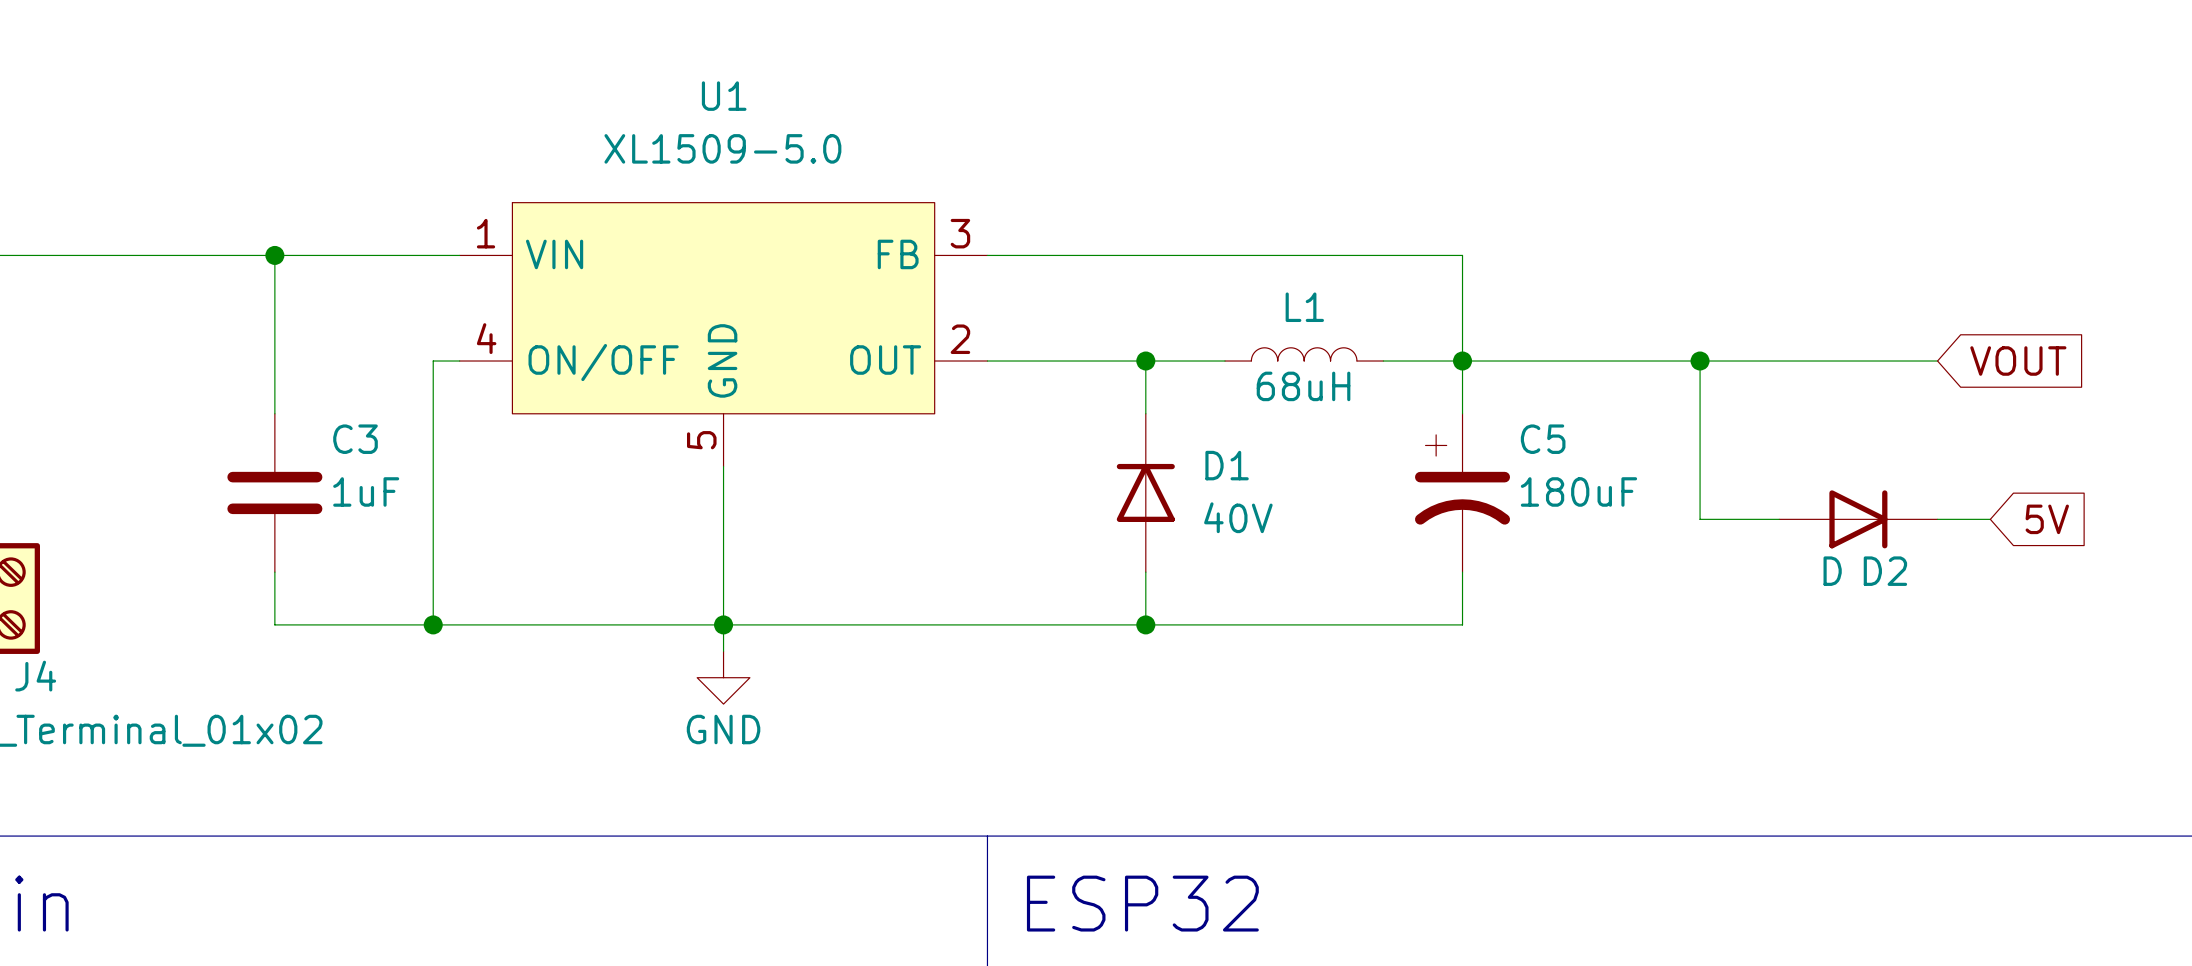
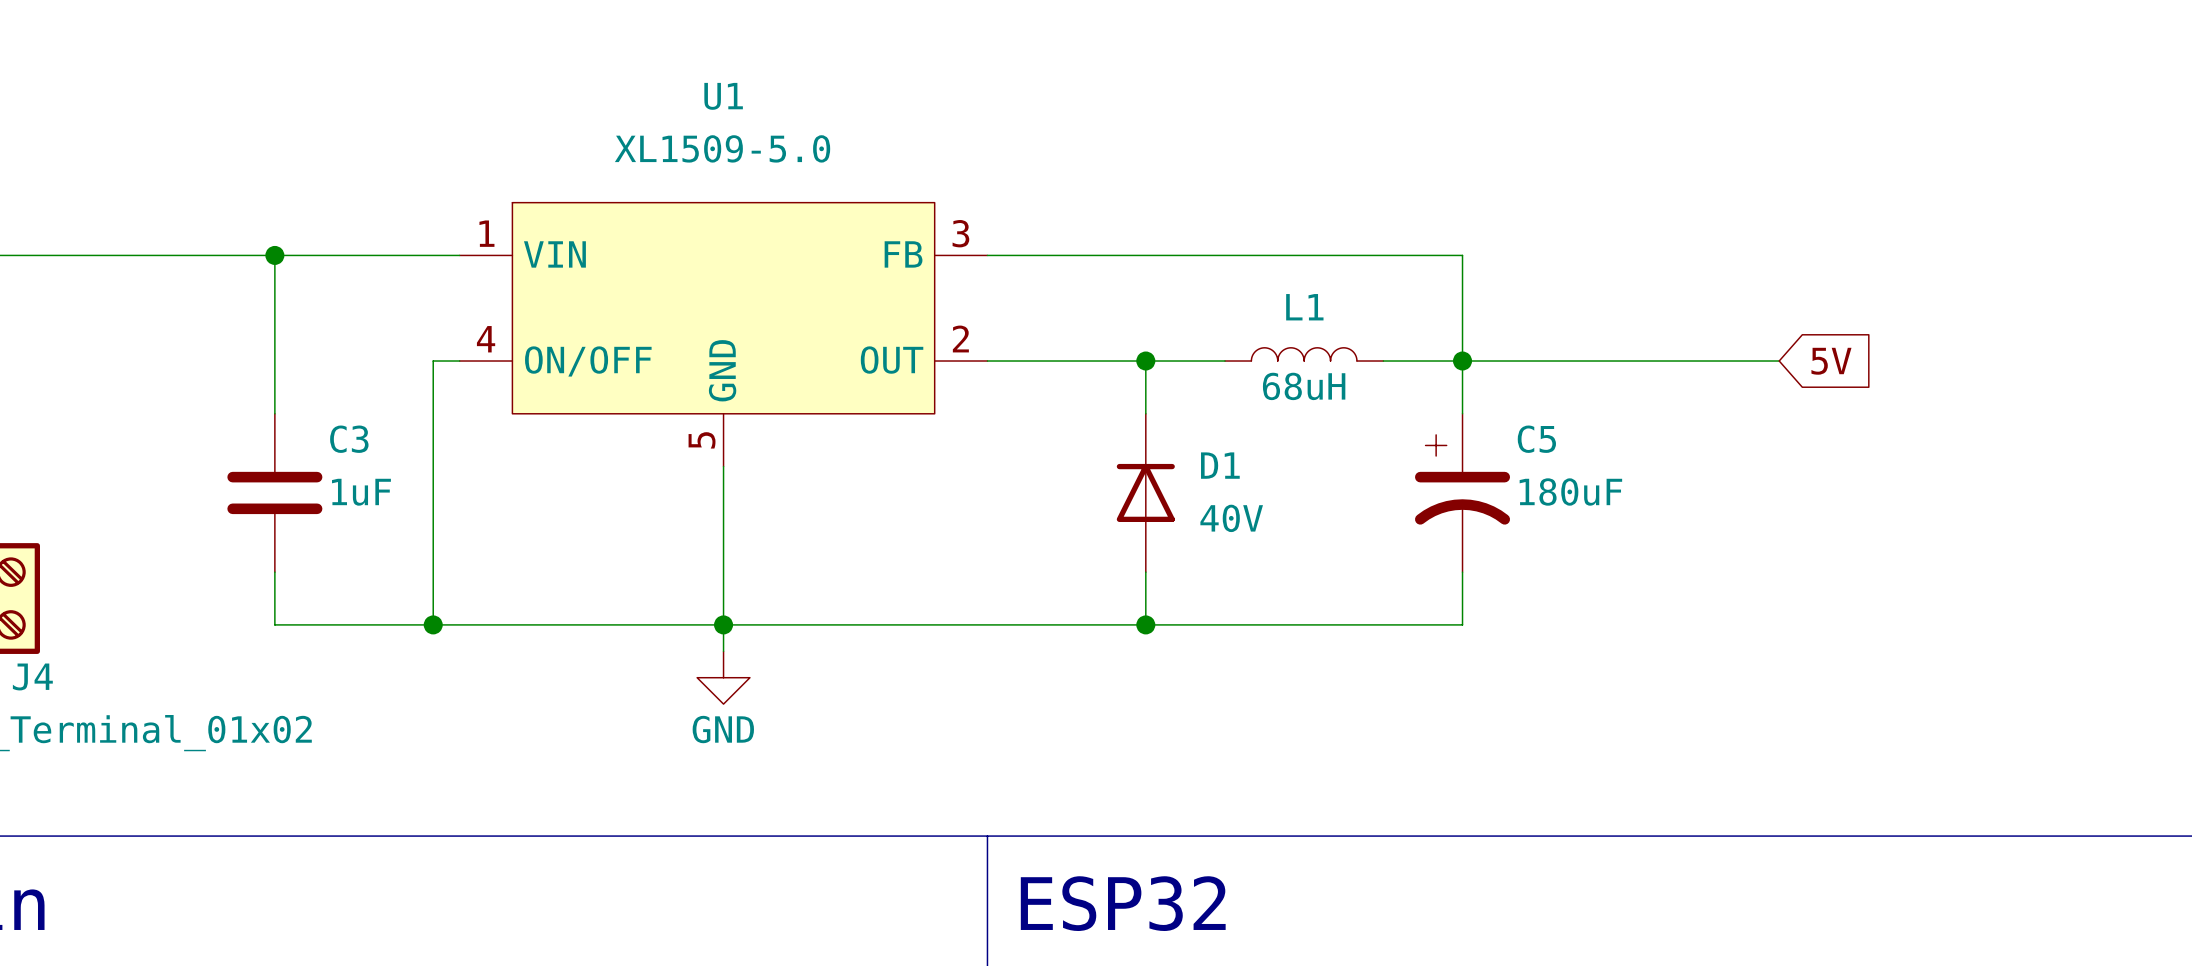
wire: (1700, 361) (1700, 519) (1779, 519) -> none
junction: (1700, 361) -> none
wire: (1779, 361) (1937, 361) -> none
global label: VOUT (2018, 361) -> none
D2: D (1858, 519) -> none
wire: (1937, 519) (1990, 519) -> none
global label position: 5V (2047, 519) -> 5V (1831, 361)

